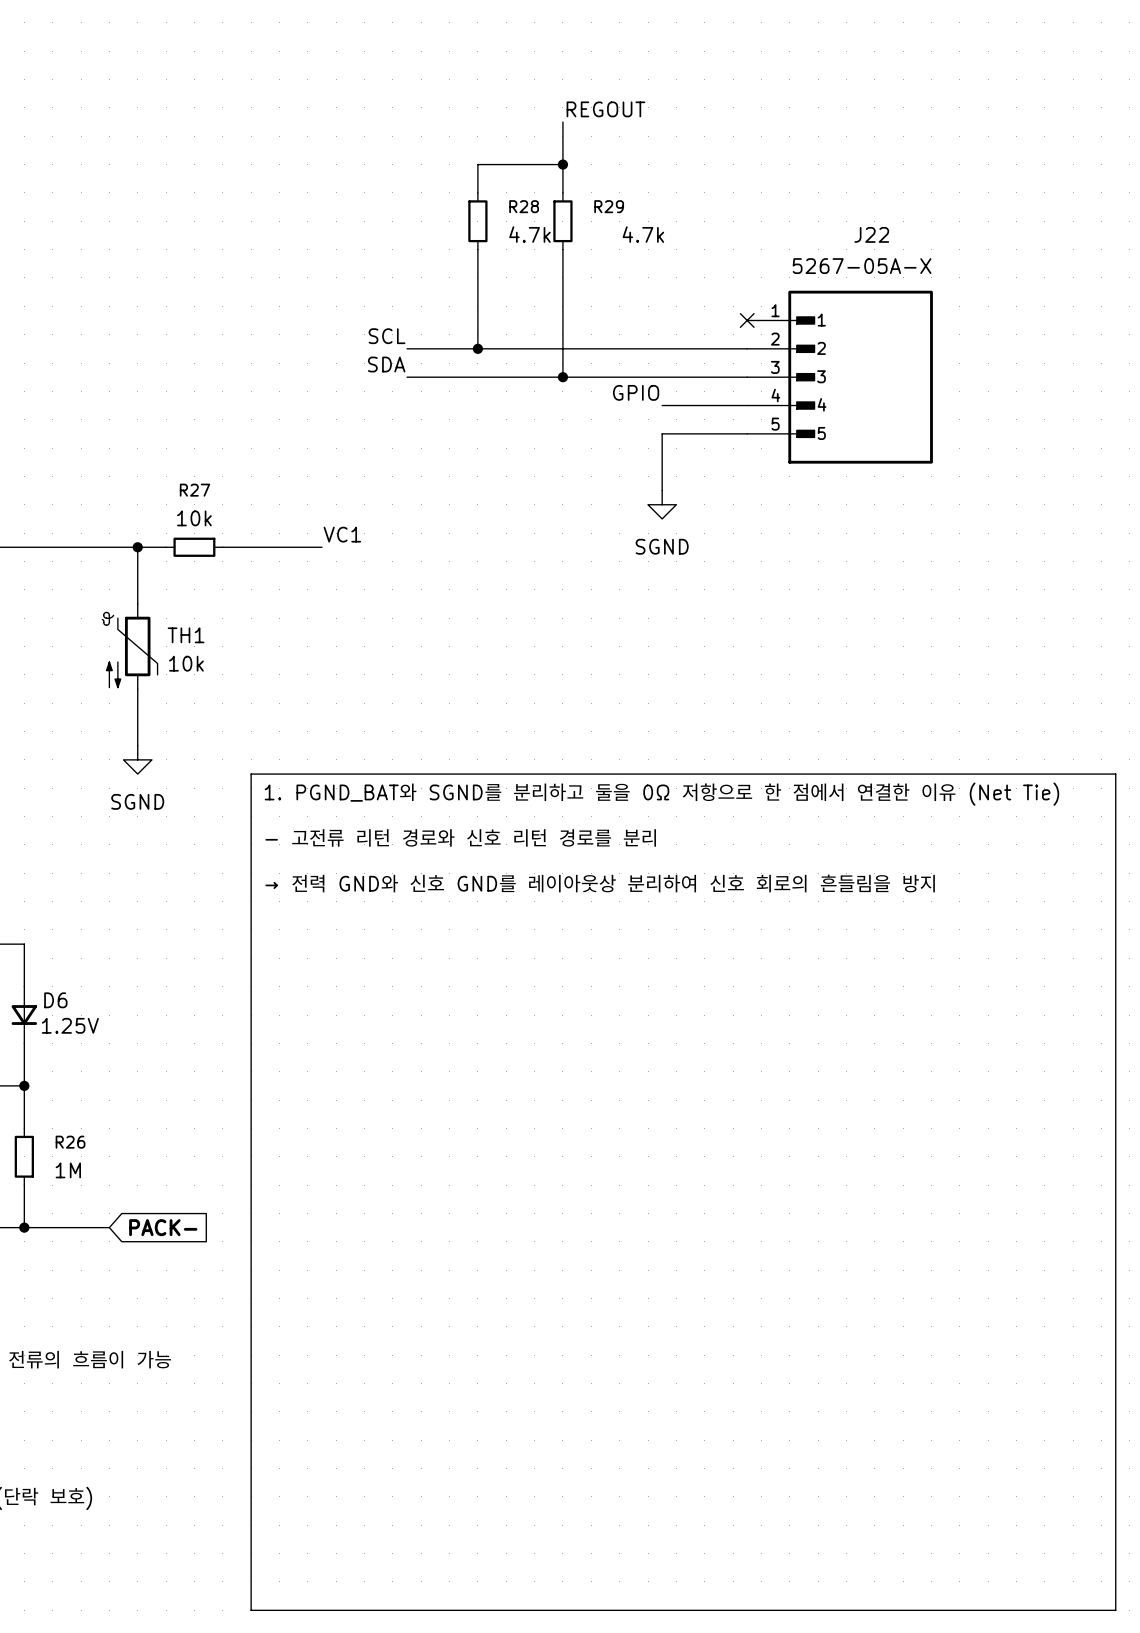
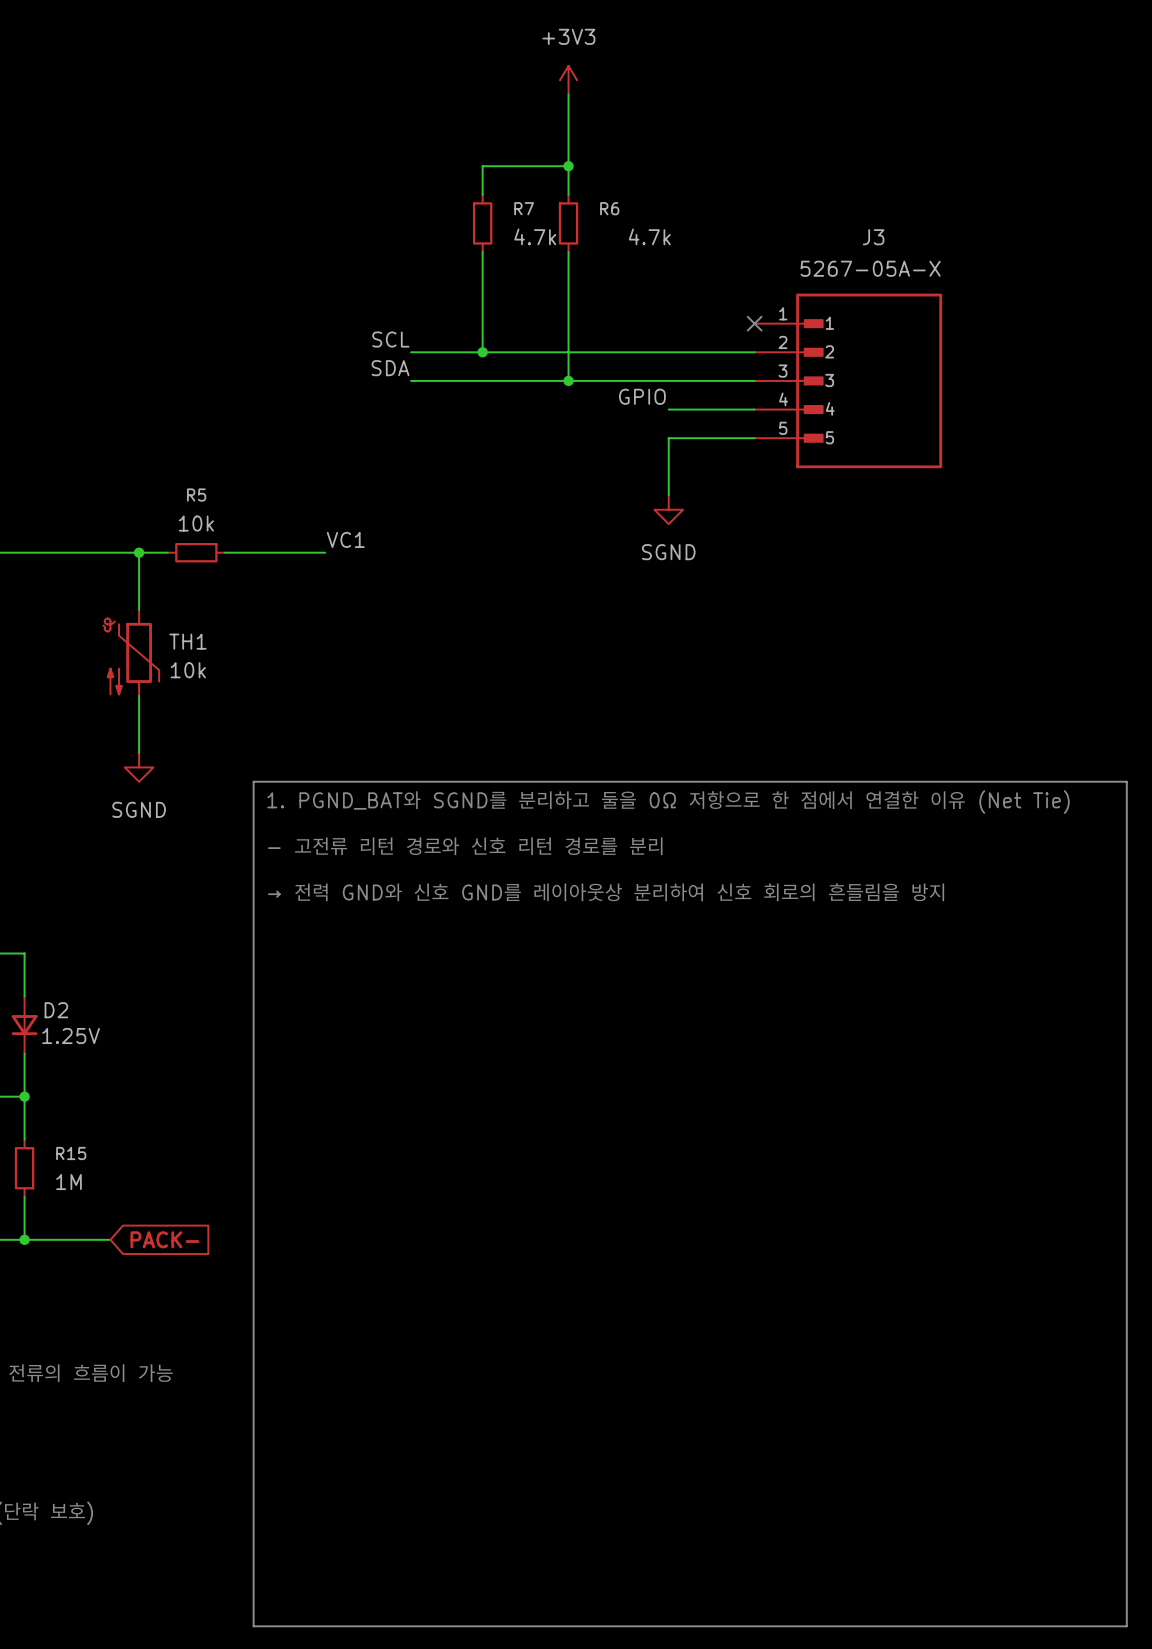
power symbol: none -> +3V3 (568, 80)
wire: none -> (568, 94) (568, 123)
label: REGOUT (605, 109) -> none
R28 name: R28 (524, 206) -> R7 (524, 208)
R29 name: R29 (609, 206) -> R6 (609, 208)
J22 name: J22 (871, 234) -> J3 (873, 237)
R27 name: R27 (194, 490) -> R5 (196, 495)
D6 name: D6 (55, 1000) -> D2 (56, 1010)
R26 name: R26 (70, 1142) -> R15 (71, 1153)

